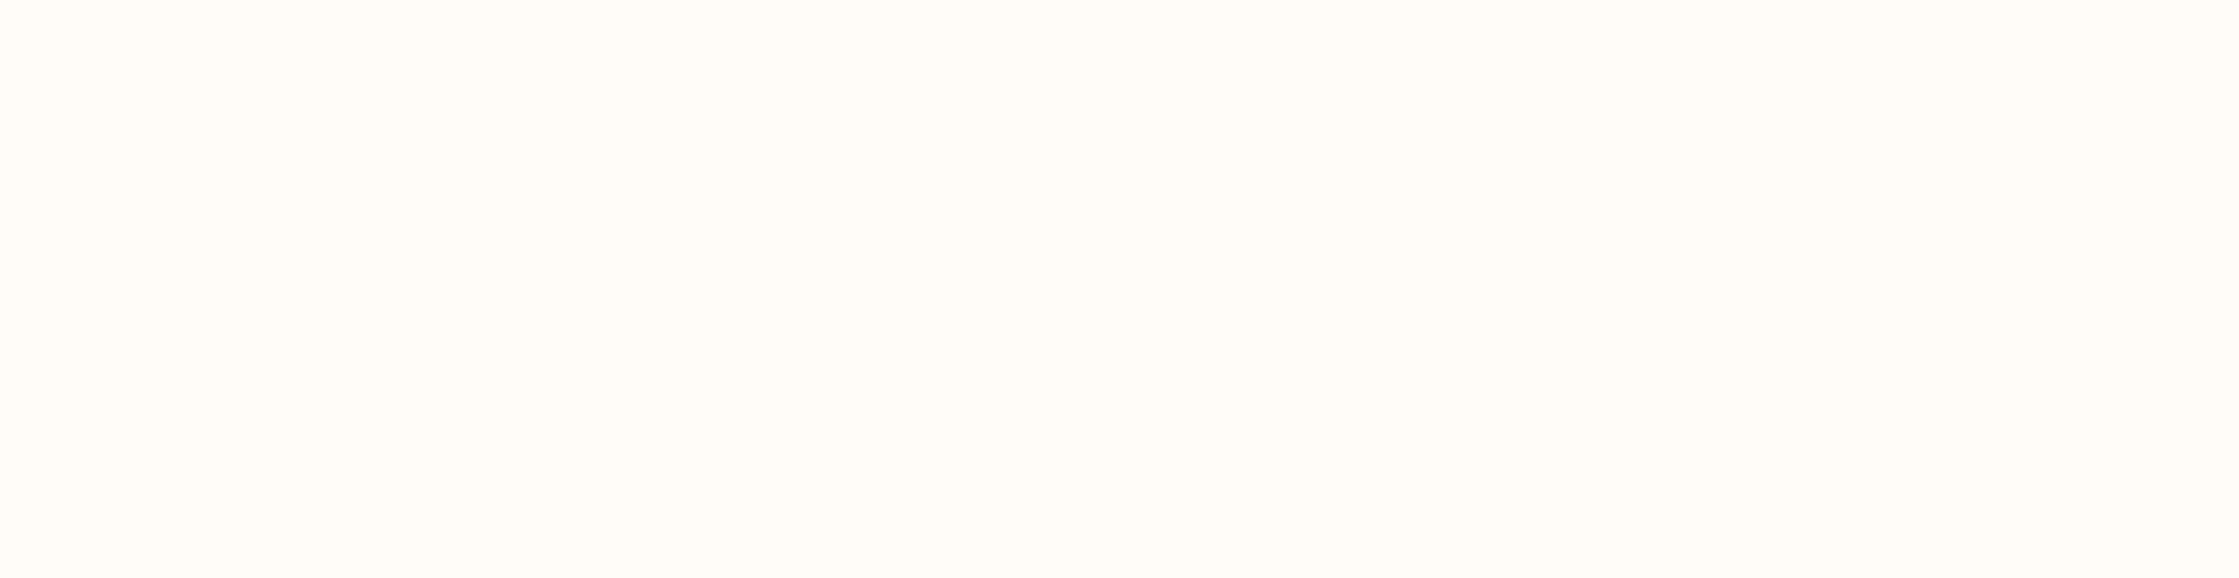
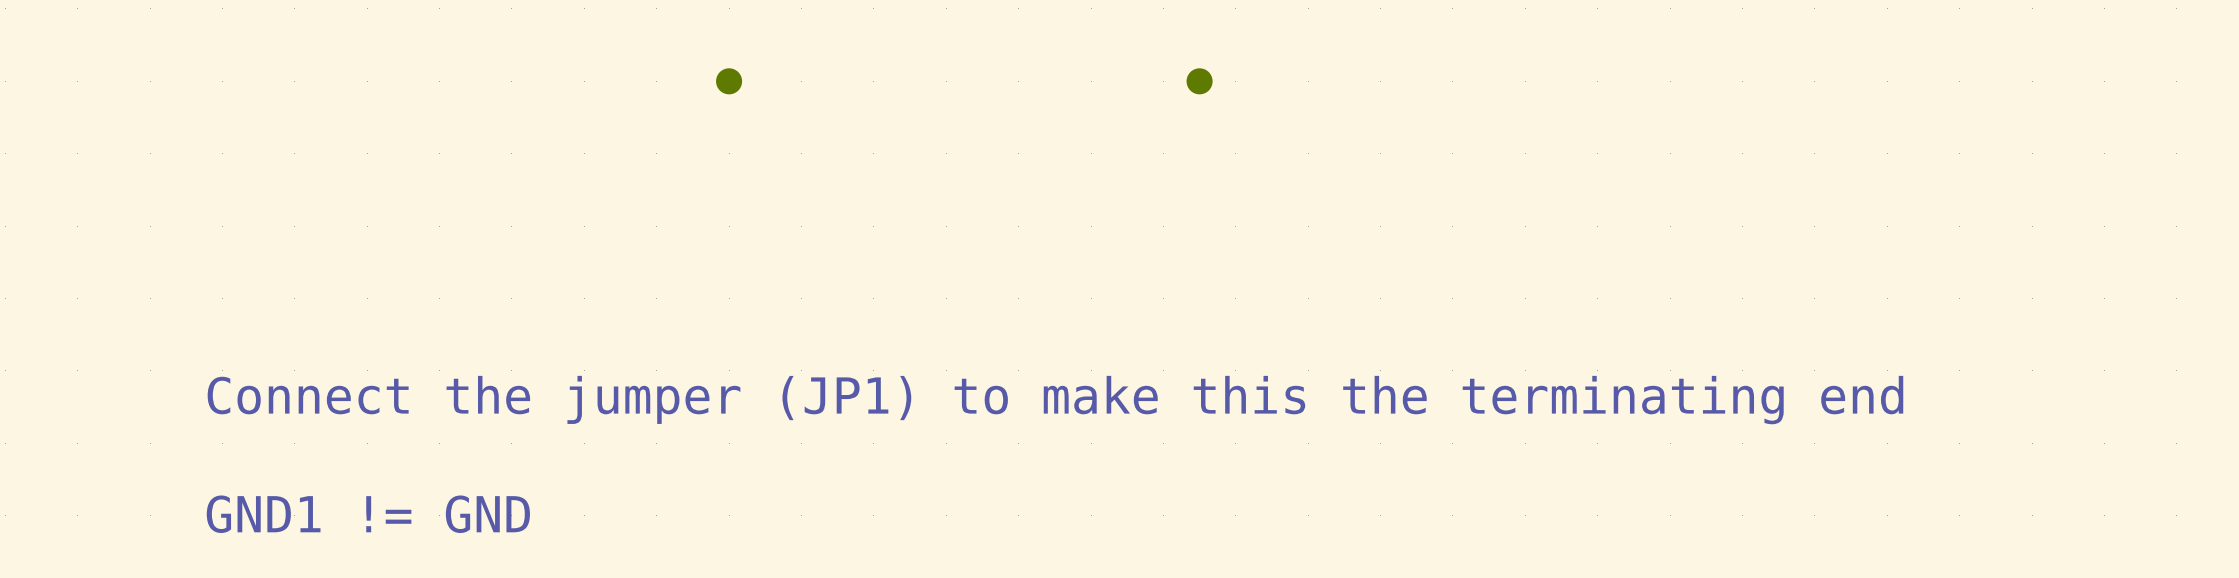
junction: none -> (729, 81)
junction: none -> (1199, 81)
text: none -> Connect the jumper (JP1) to make this the terminating end (1055, 400)
text: none -> GND1 != GND (368, 514)

